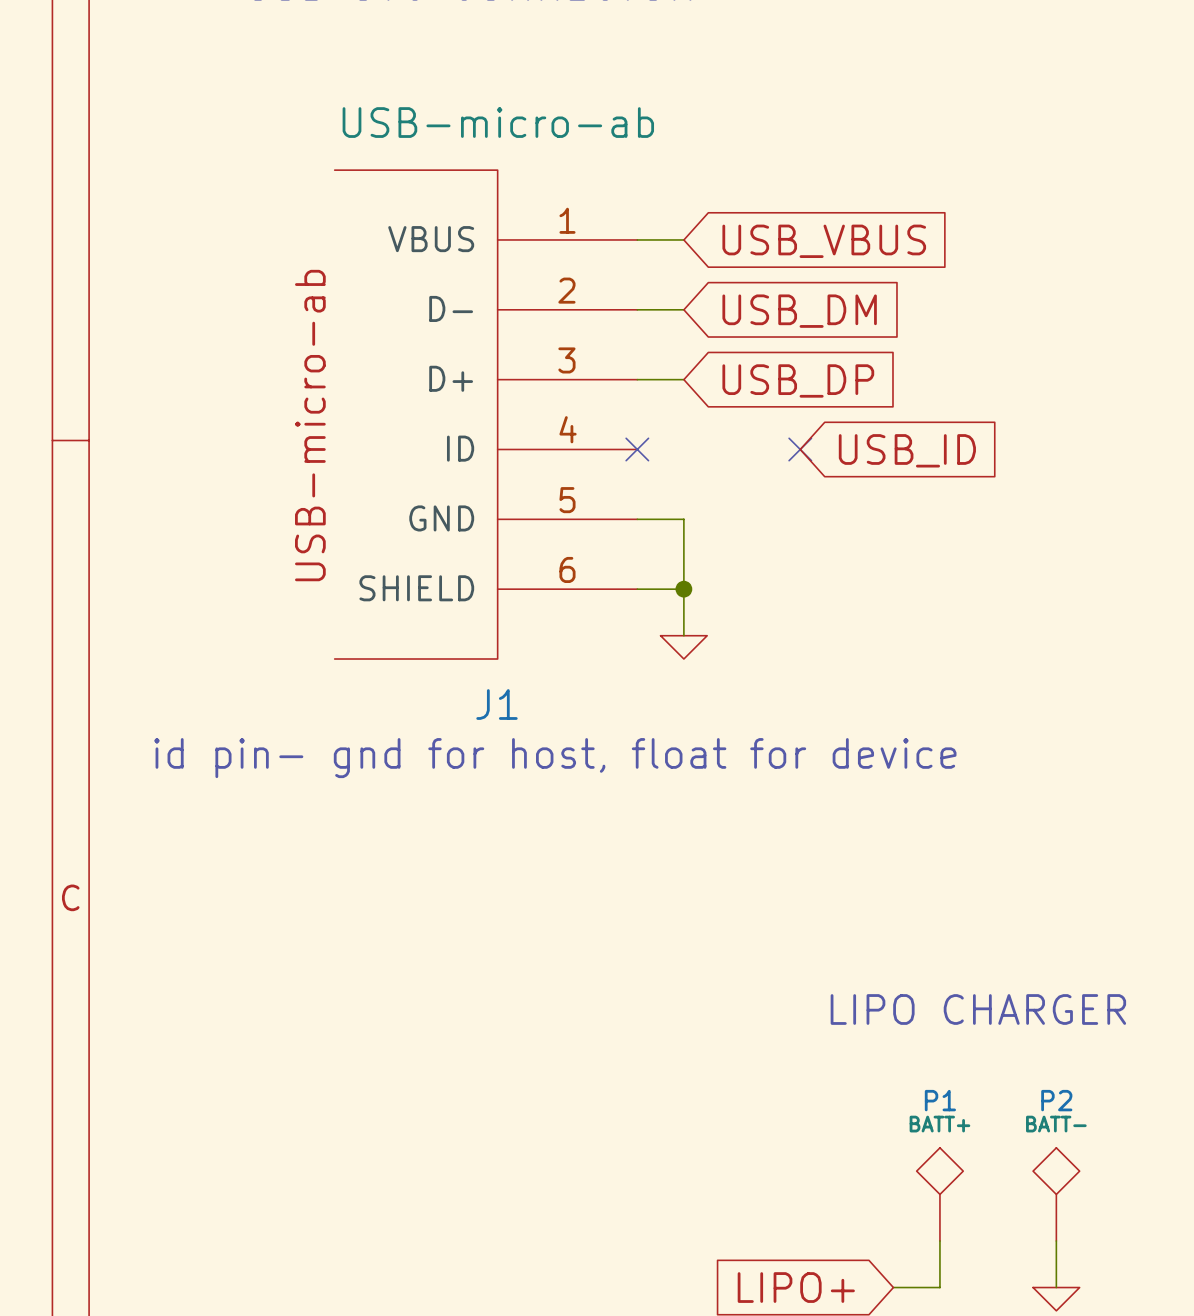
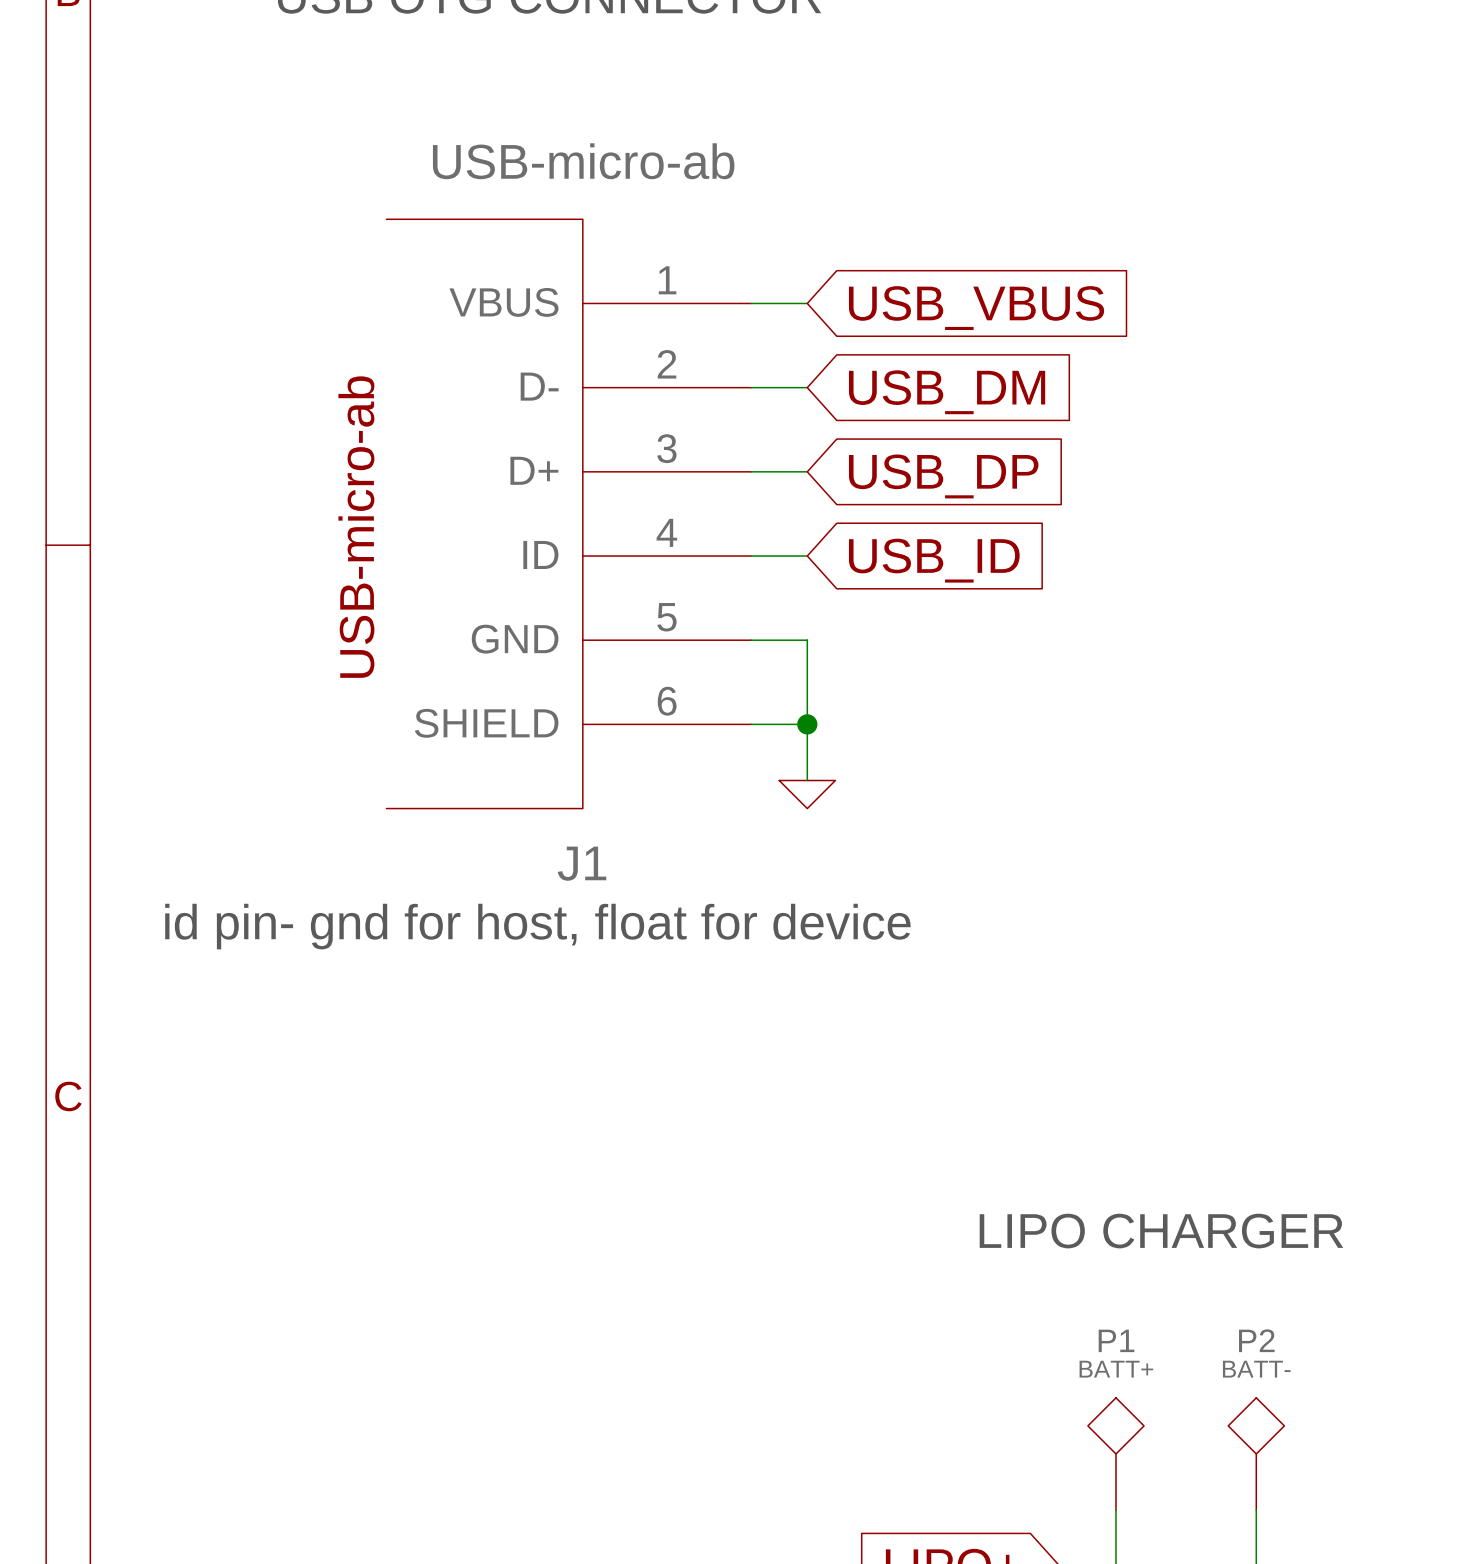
wire: none -> (751, 556) (807, 556)
no-connect mark: (637, 449) -> none
no-connect mark: (800, 449) -> none
global label position: USB_ID (907, 450) -> USB_ID (934, 560)

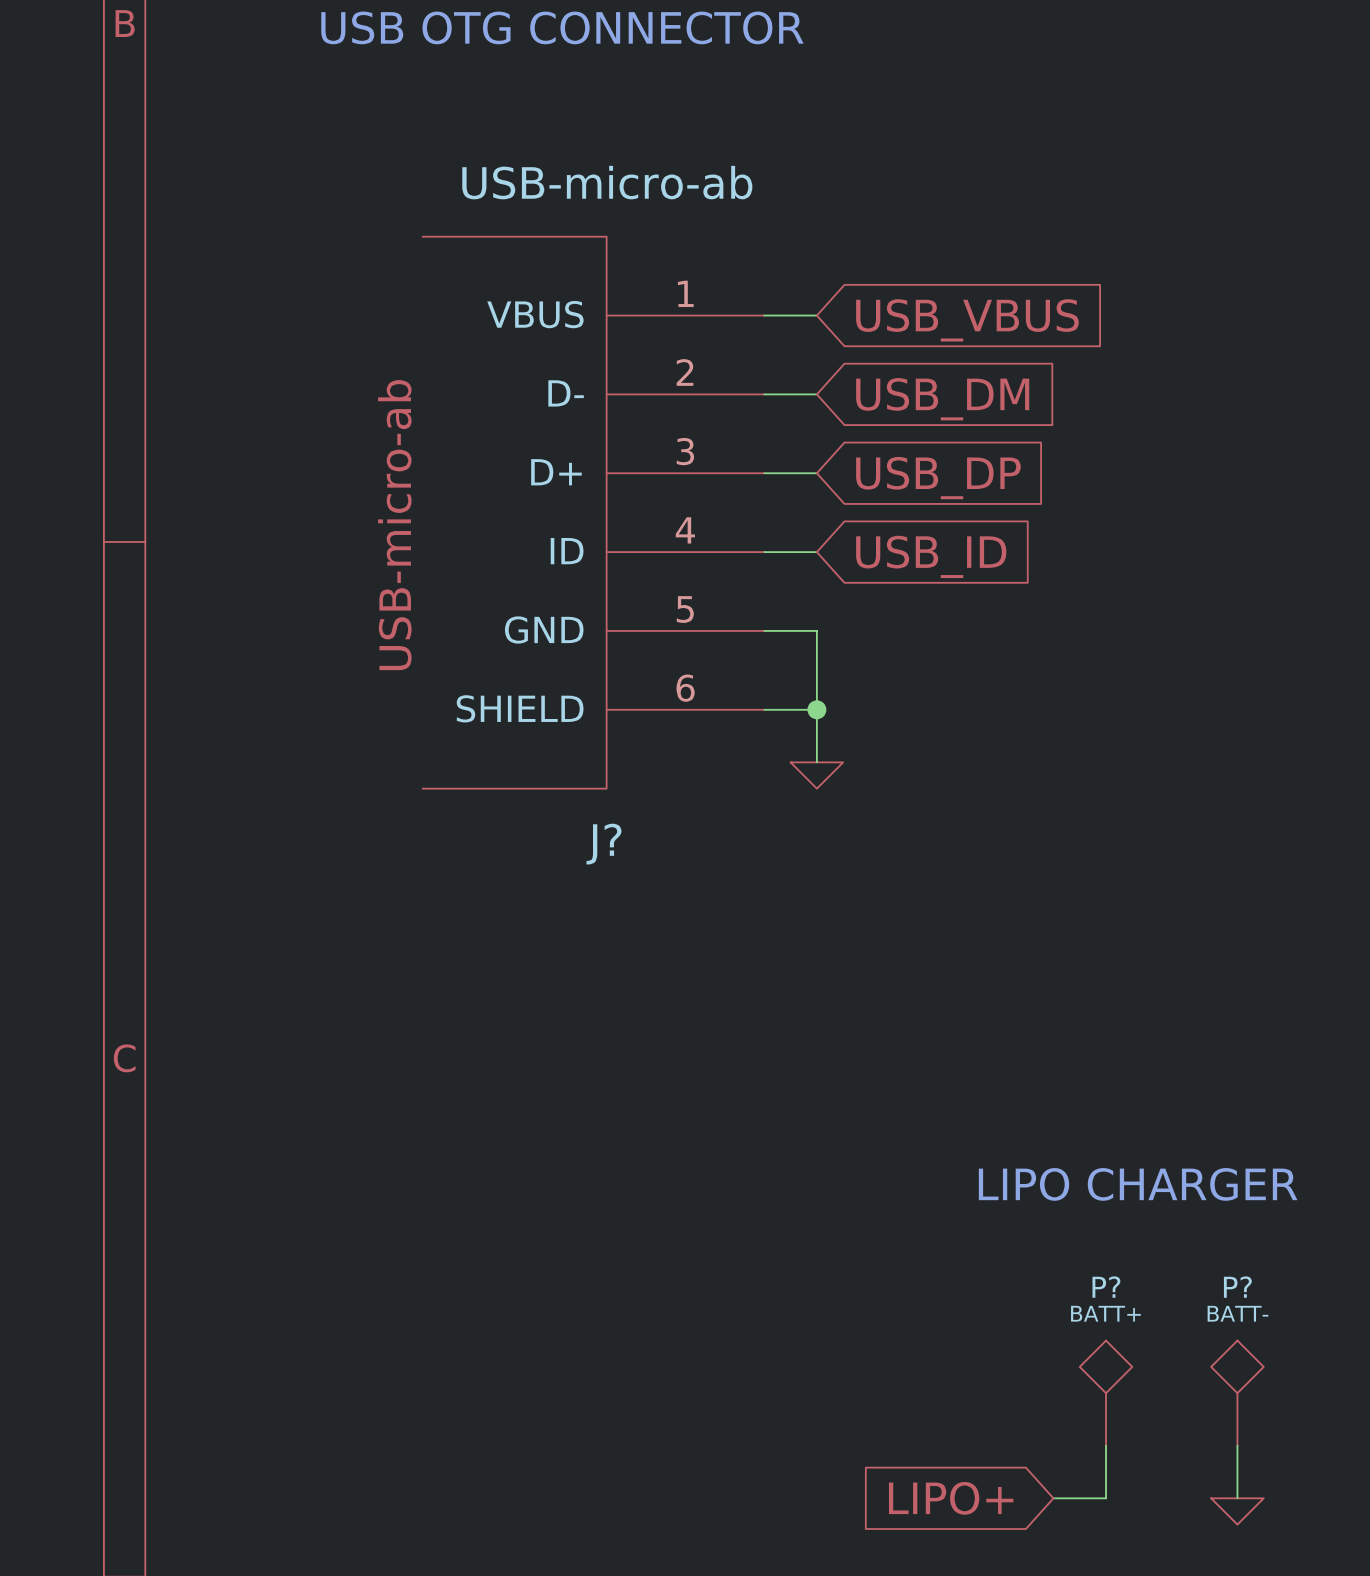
J1 name: J1 (582, 863) -> J? (604, 844)
text: id pin- gnd for host, float for device (537, 926) -> none
P1 name: P1 (1116, 1340) -> P? (1106, 1287)
P2 name: P2 (1256, 1340) -> P? (1237, 1287)

